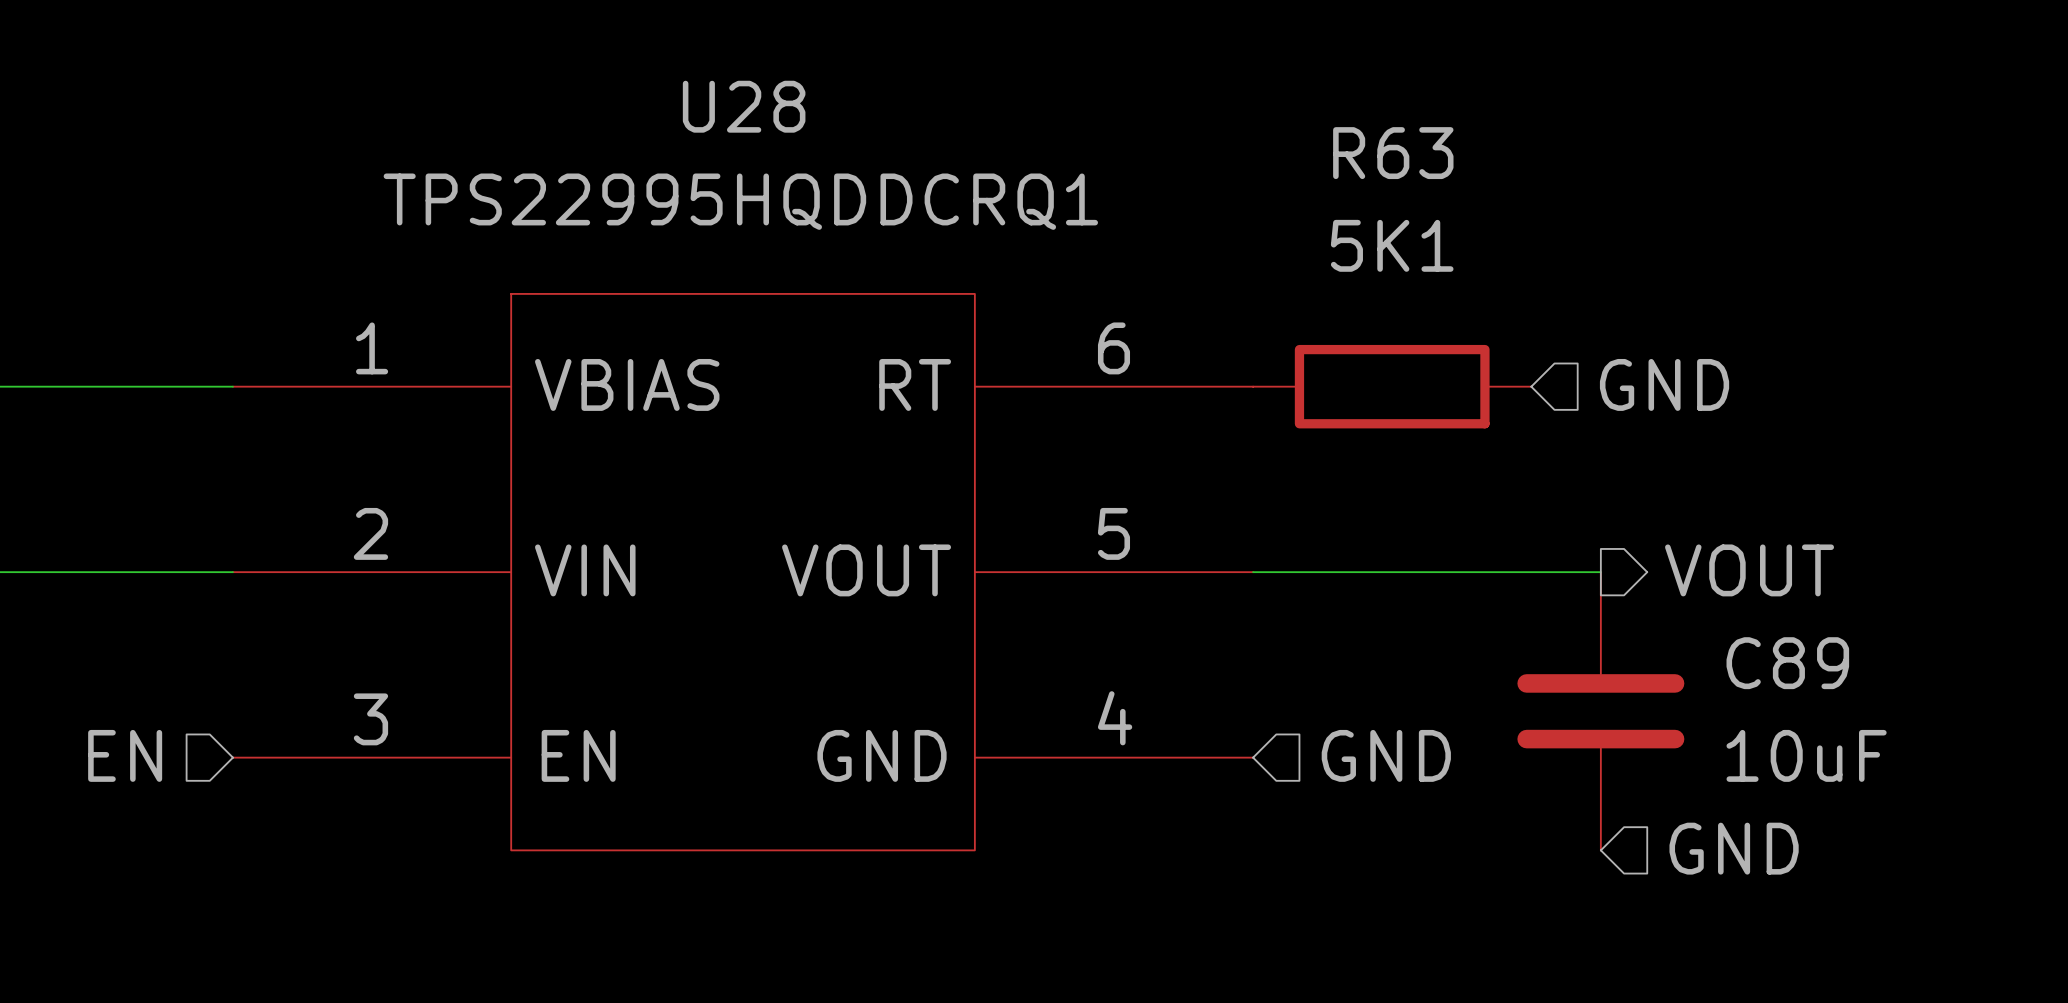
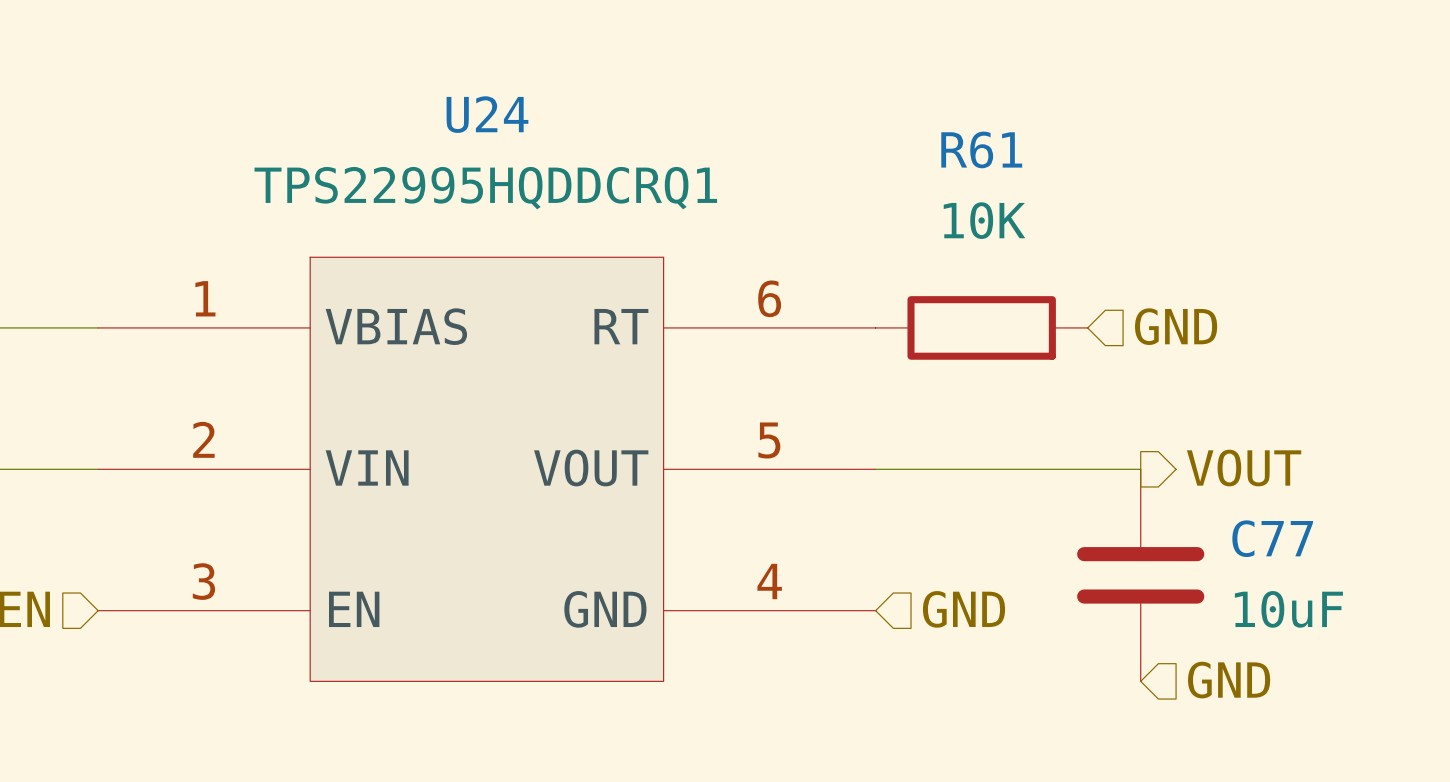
U28 name: U28 (744, 106) -> U24 (487, 114)
R63 name: R63 (1393, 153) -> R61 (981, 149)
R63 value: 5K1 (1392, 245) -> 10K (984, 220)
C89 name: C89 (1787, 663) -> C77 (1272, 538)

